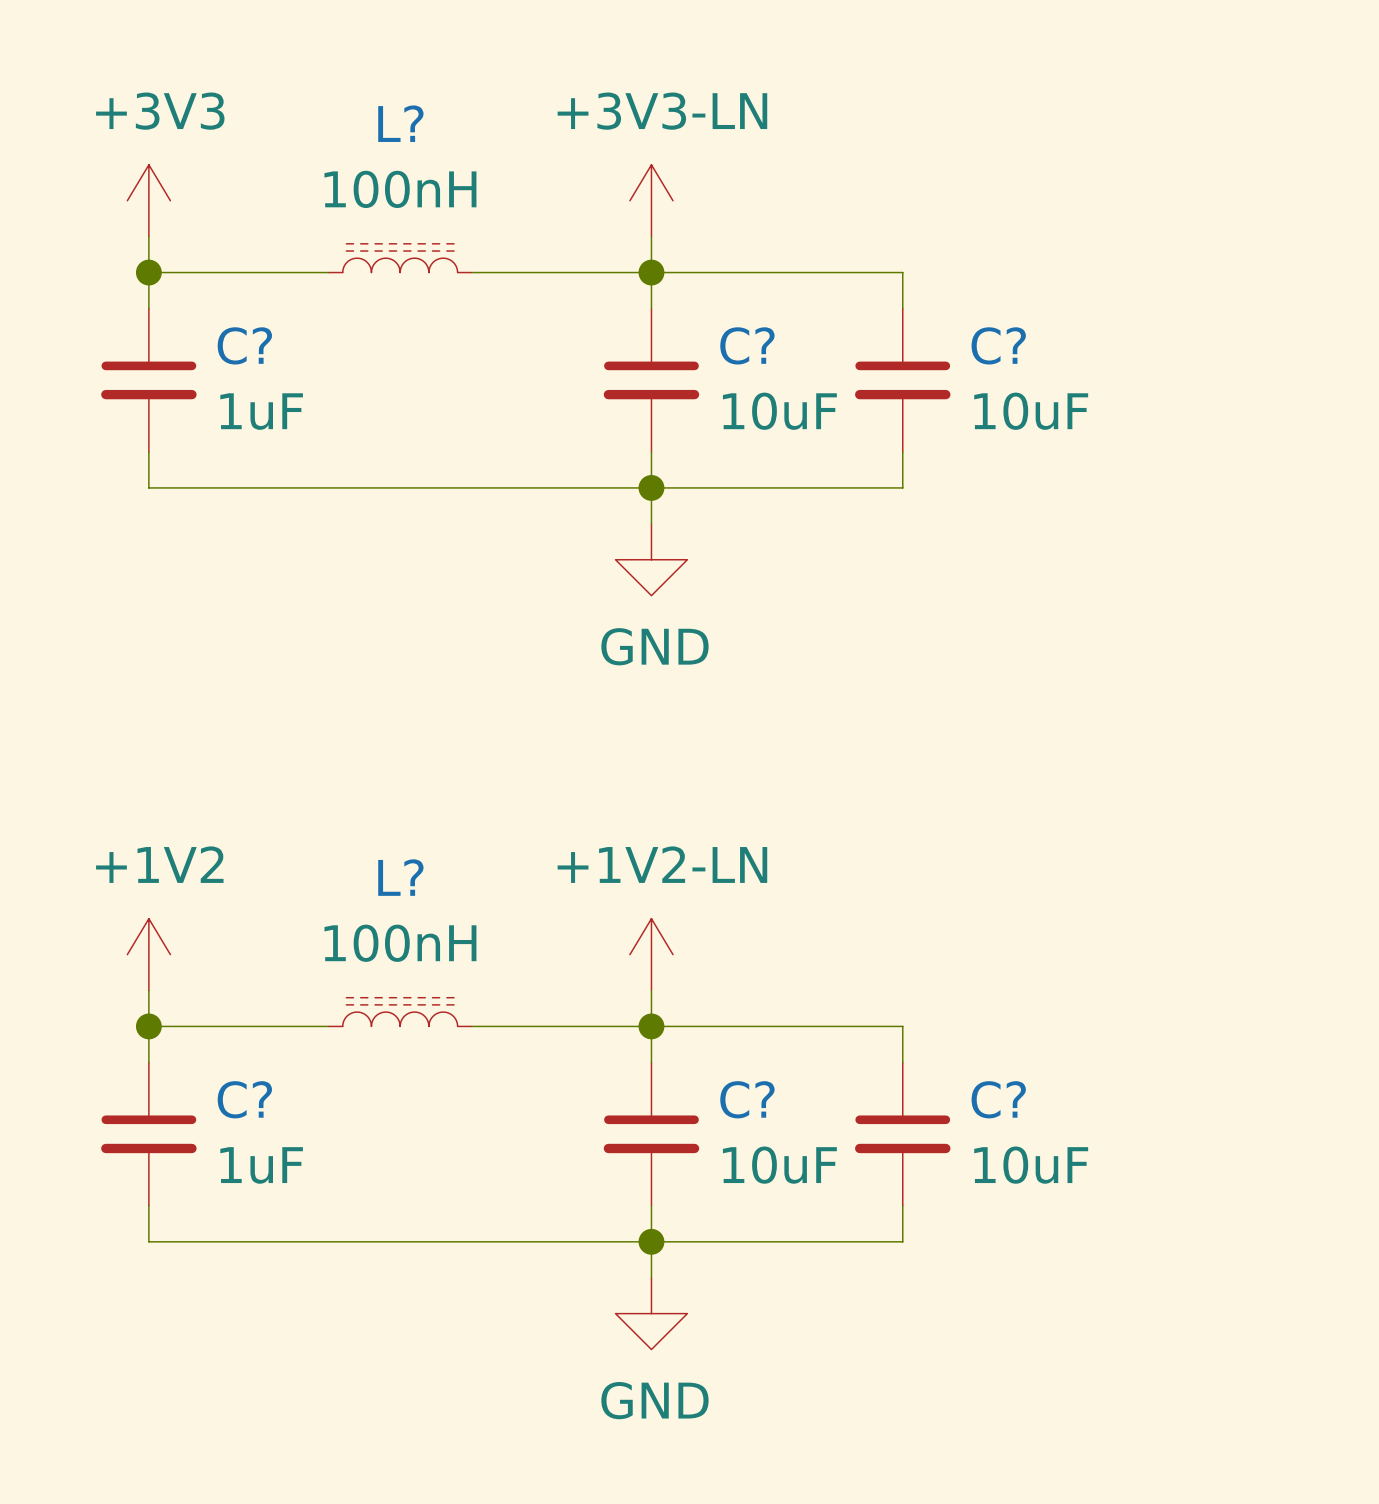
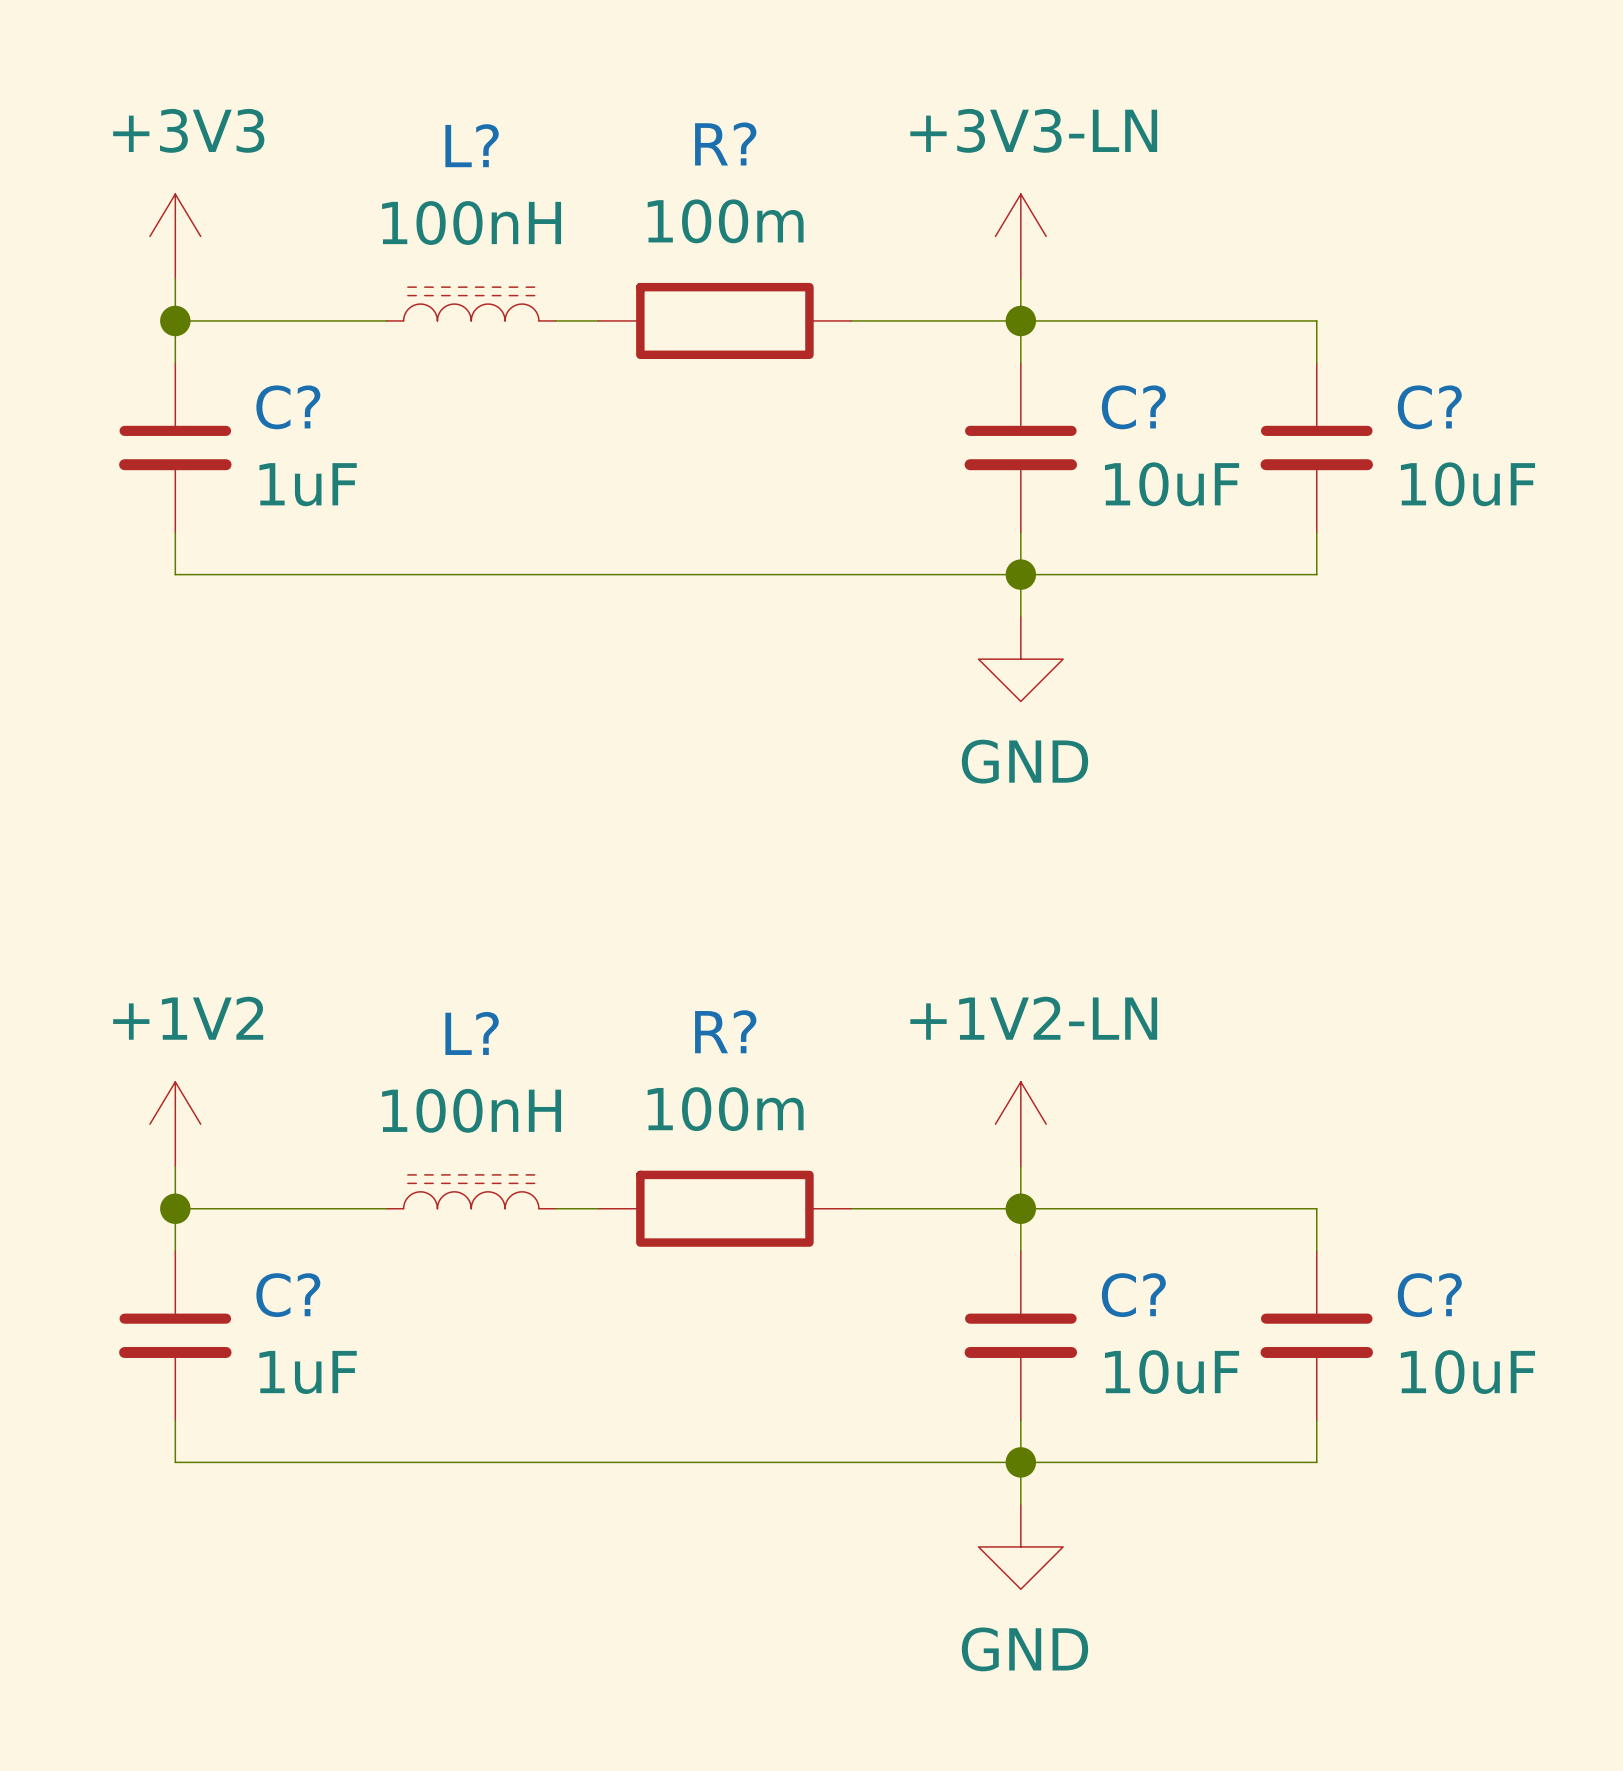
power symbol position: +3V3-LN (651, 200) -> +3V3-LN (1020, 236)
wire: (651, 236) (651, 308) -> (1020, 278) (1020, 363)
wire: (507, 272) (723, 272) -> none
R?: none -> 100m (724, 320)
junction: (651, 272) -> none
junction: none -> (1020, 320)
wire: (902, 272) (902, 308) -> (1063, 320) (1316, 320) (1316, 363)
C?: 10uF (651, 380) -> none
C? position: (902, 380) -> (1020, 447)
C?: none -> 10uF (1316, 447)
wire: (651, 452) (651, 523) -> (1020, 532) (1020, 616)
wire: (902, 452) (902, 487) -> (1316, 532) (1316, 574) (1063, 574)
junction: (651, 487) -> none
junction: none -> (1020, 574)
power symbol position: GND (651, 559) -> GND (1020, 659)
power symbol position: +1V2-LN (651, 954) -> +1V2-LN (1020, 1124)
wire: (651, 990) (651, 1062) -> (1020, 1166) (1020, 1251)
wire: (507, 1026) (723, 1026) -> none
R?: none -> 100m (724, 1208)
junction: (651, 1026) -> none
junction: none -> (1020, 1208)
wire: (902, 1026) (902, 1062) -> (1063, 1208) (1316, 1208) (1316, 1251)
C?: 10uF (651, 1134) -> none
C? position: (902, 1134) -> (1020, 1335)
C?: none -> 10uF (1316, 1335)
wire: (651, 1205) (651, 1277) -> (1020, 1420) (1020, 1504)
wire: (902, 1205) (902, 1241) -> (1316, 1420) (1316, 1462) (1063, 1462)
junction: (651, 1241) -> none
junction: none -> (1020, 1462)
power symbol position: GND (651, 1313) -> GND (1020, 1546)

